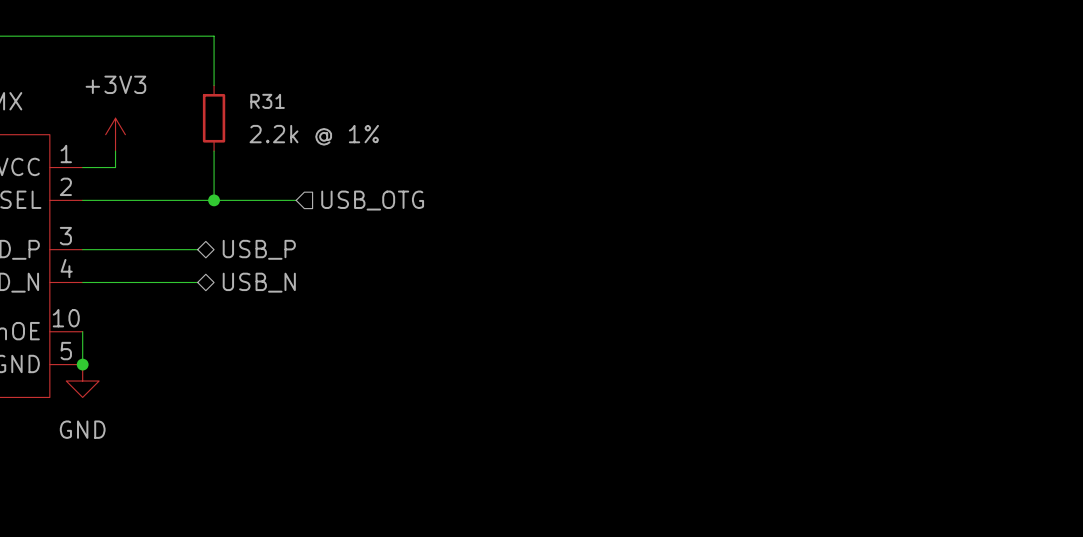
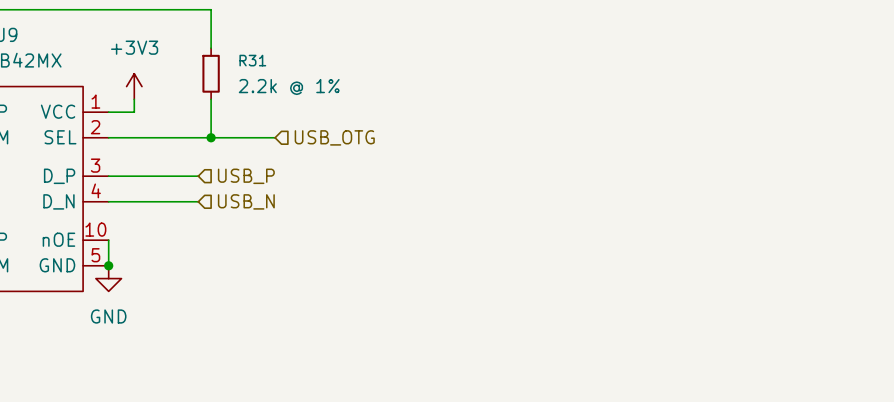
hierarchical label shape: bidirectional (259, 249) -> input (246, 176)
hierarchical label shape: bidirectional (259, 282) -> input (246, 201)

